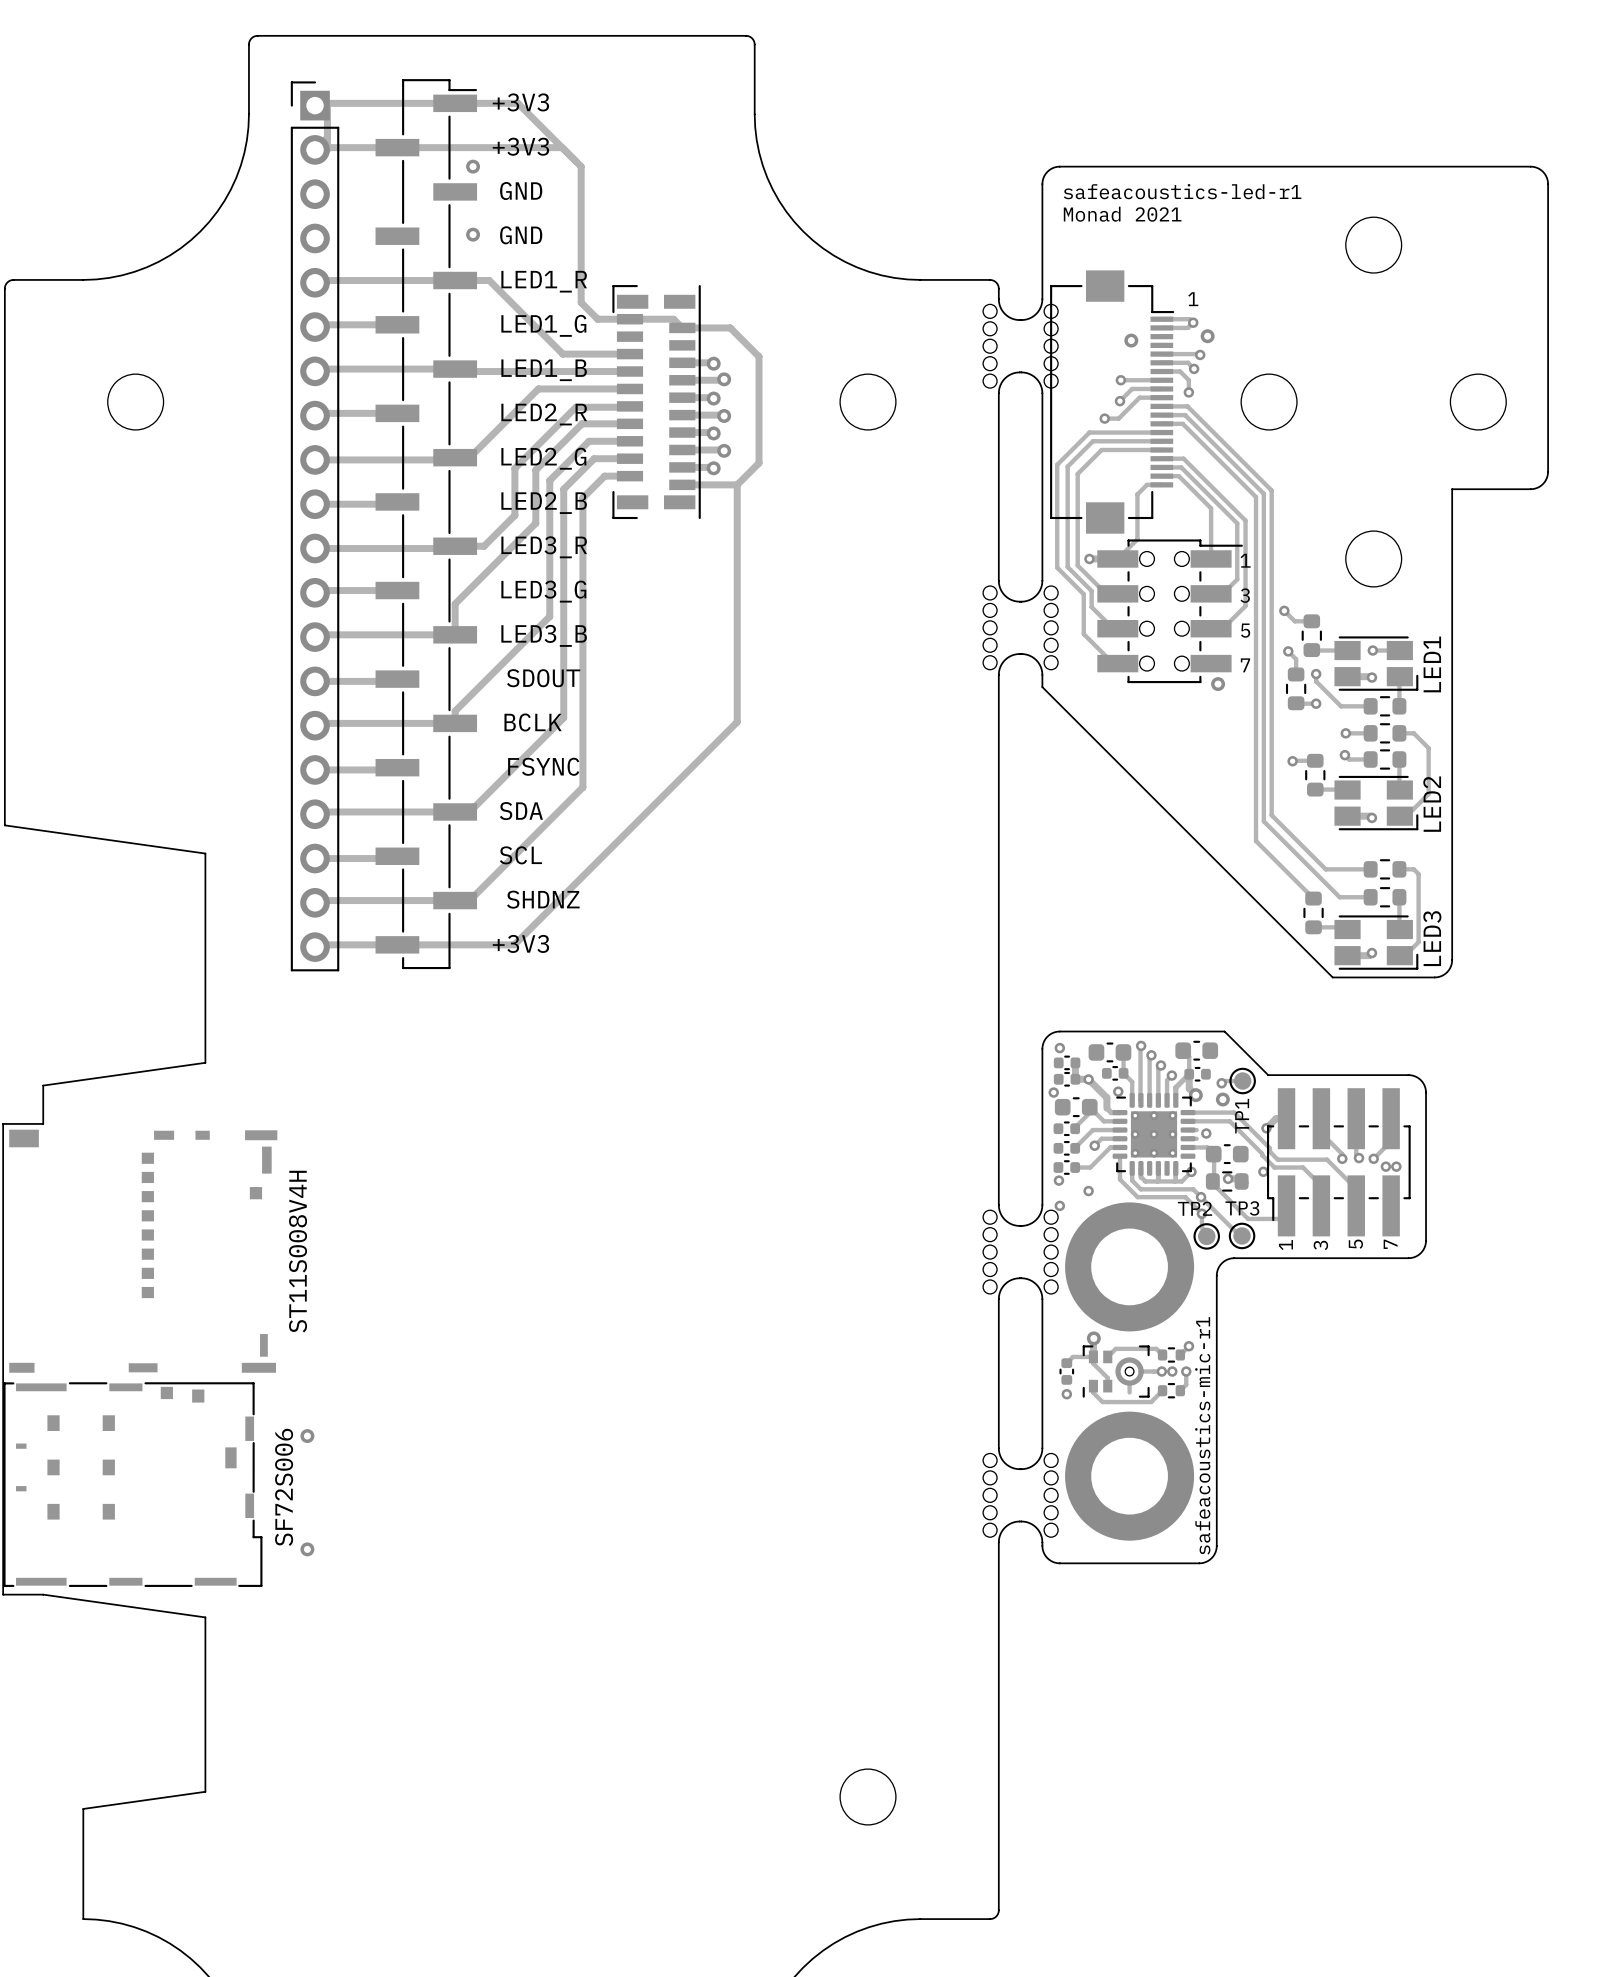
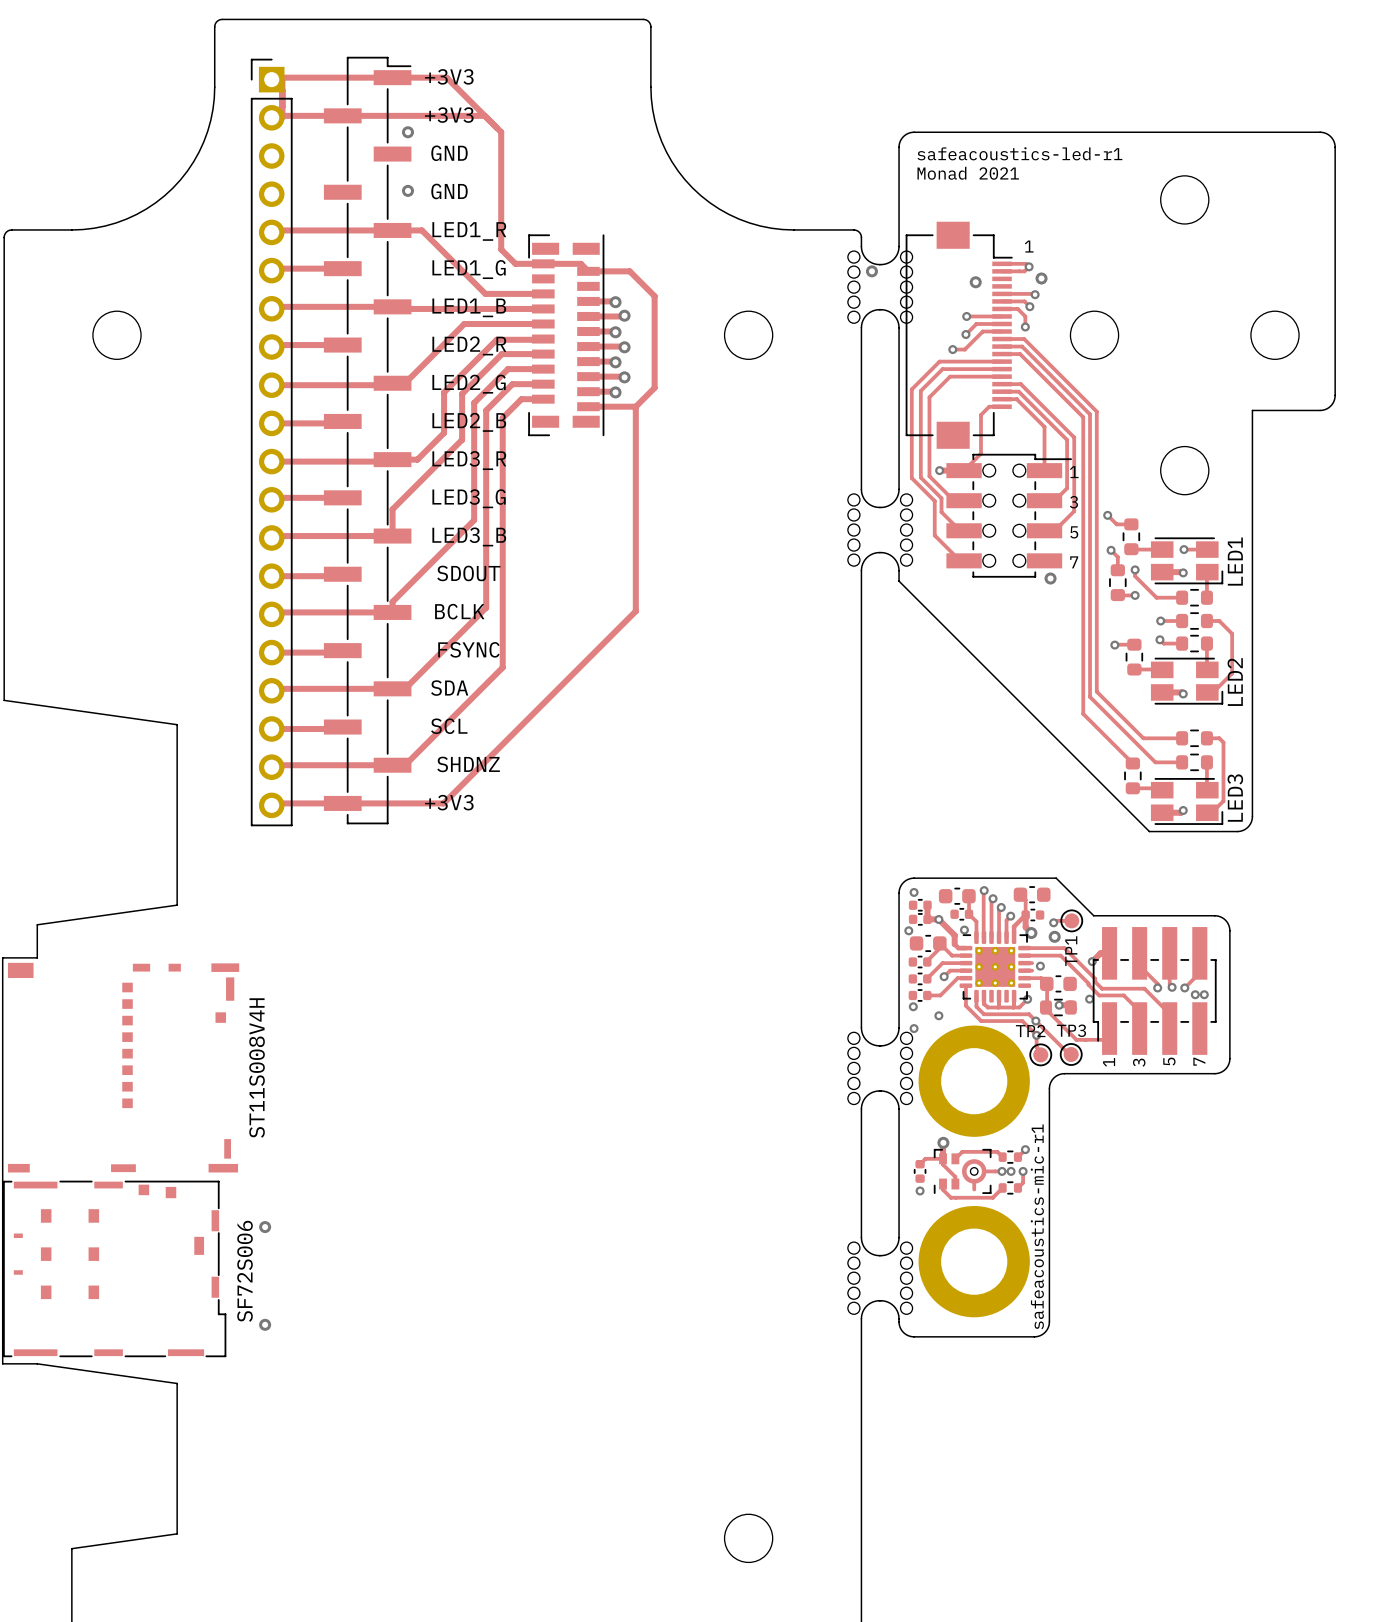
via: none -> (871, 271)

